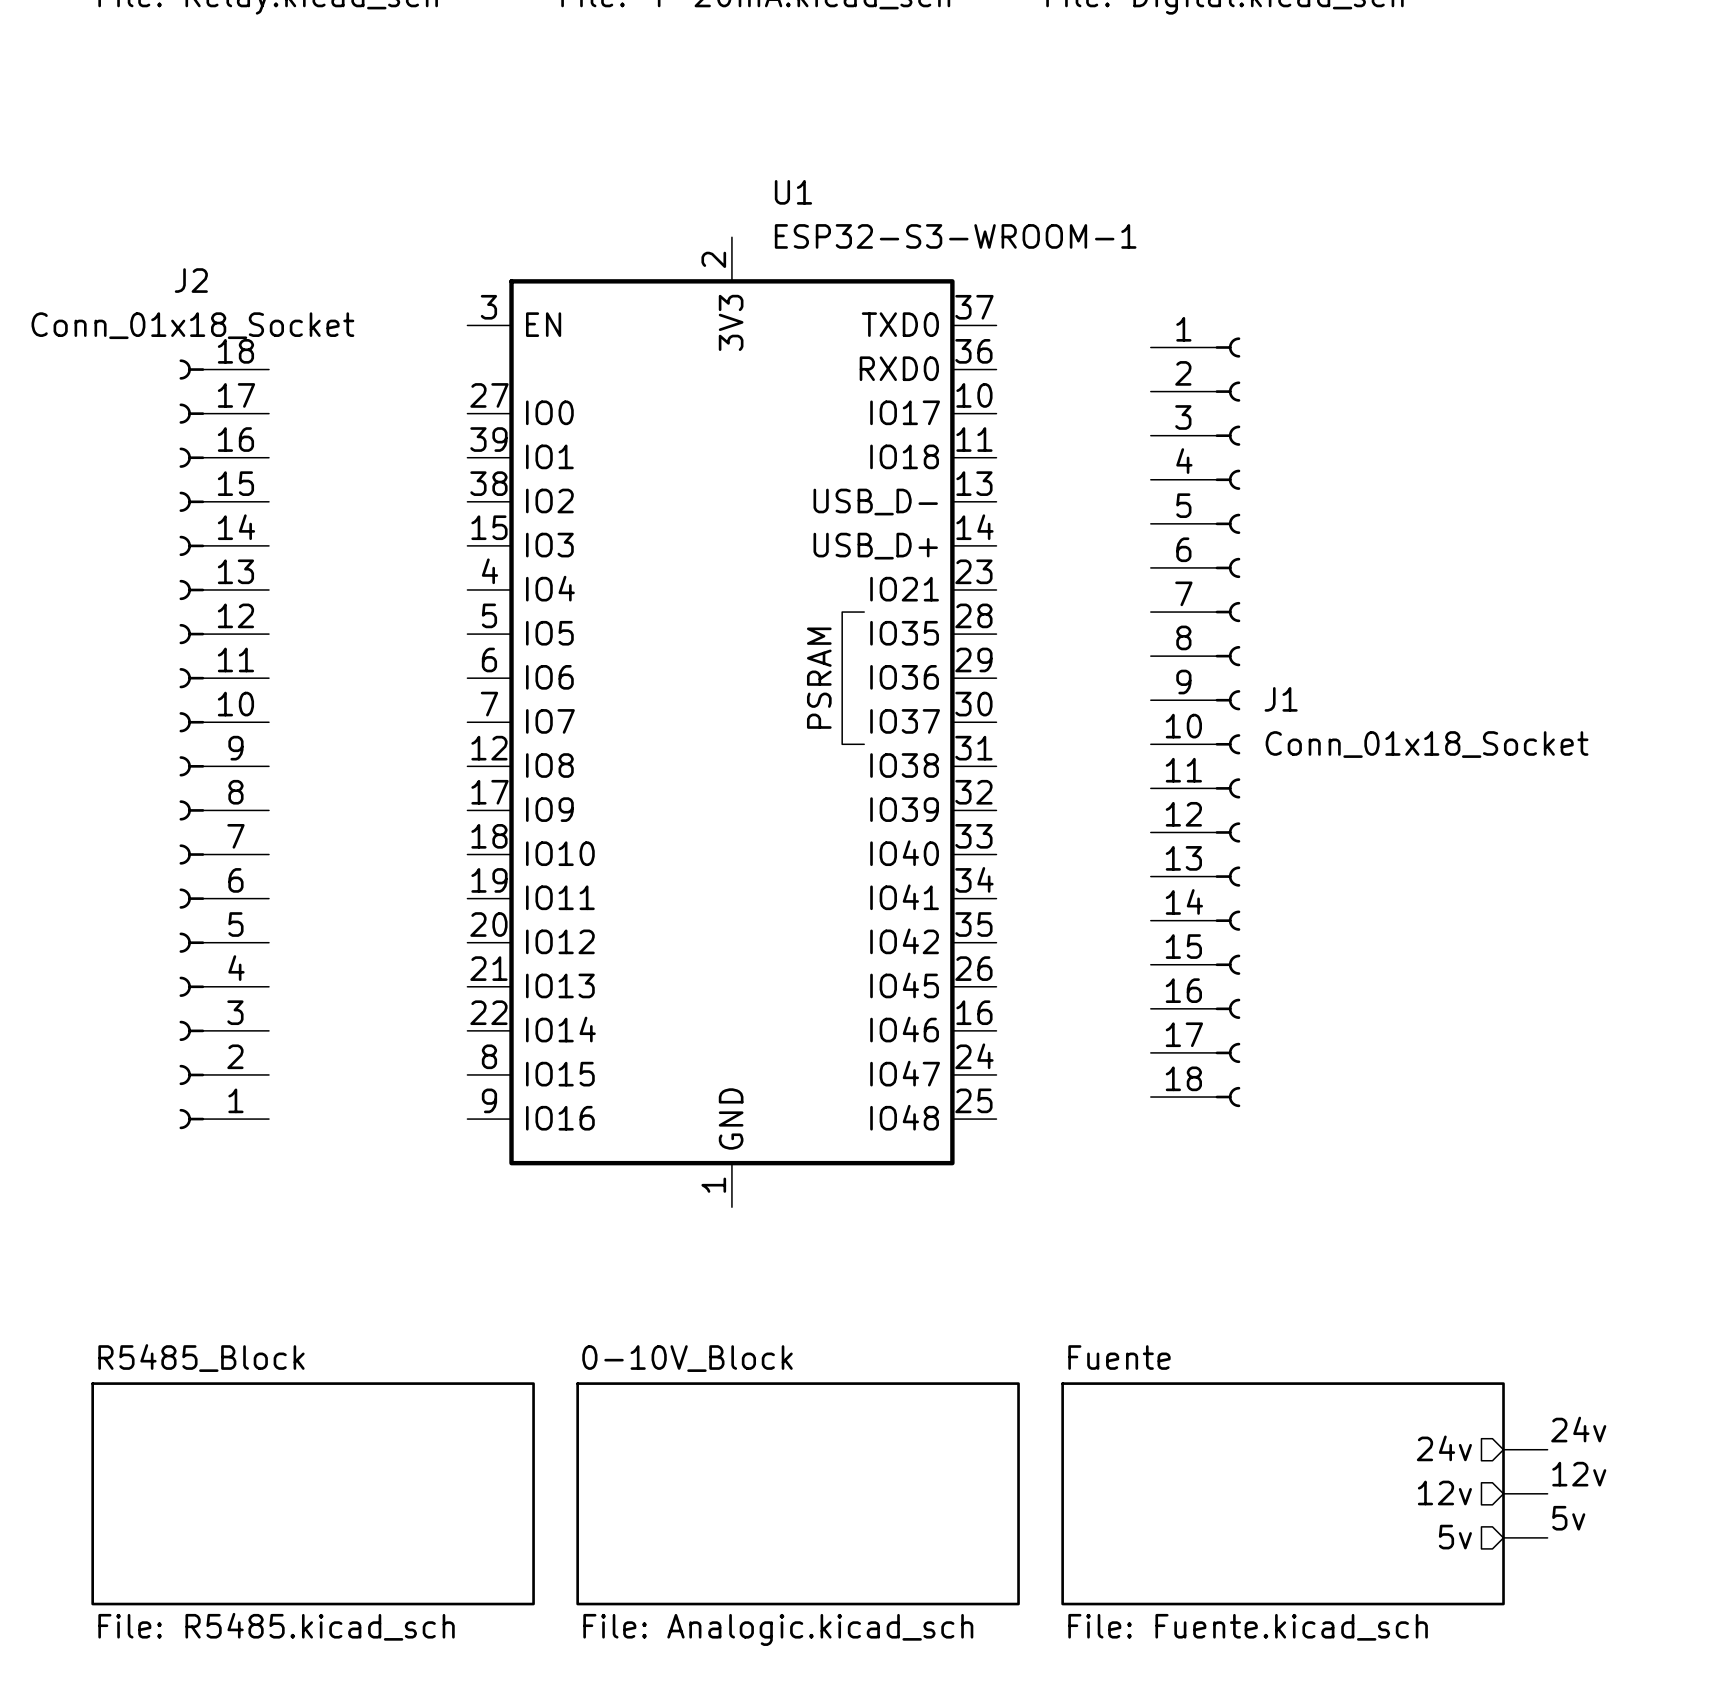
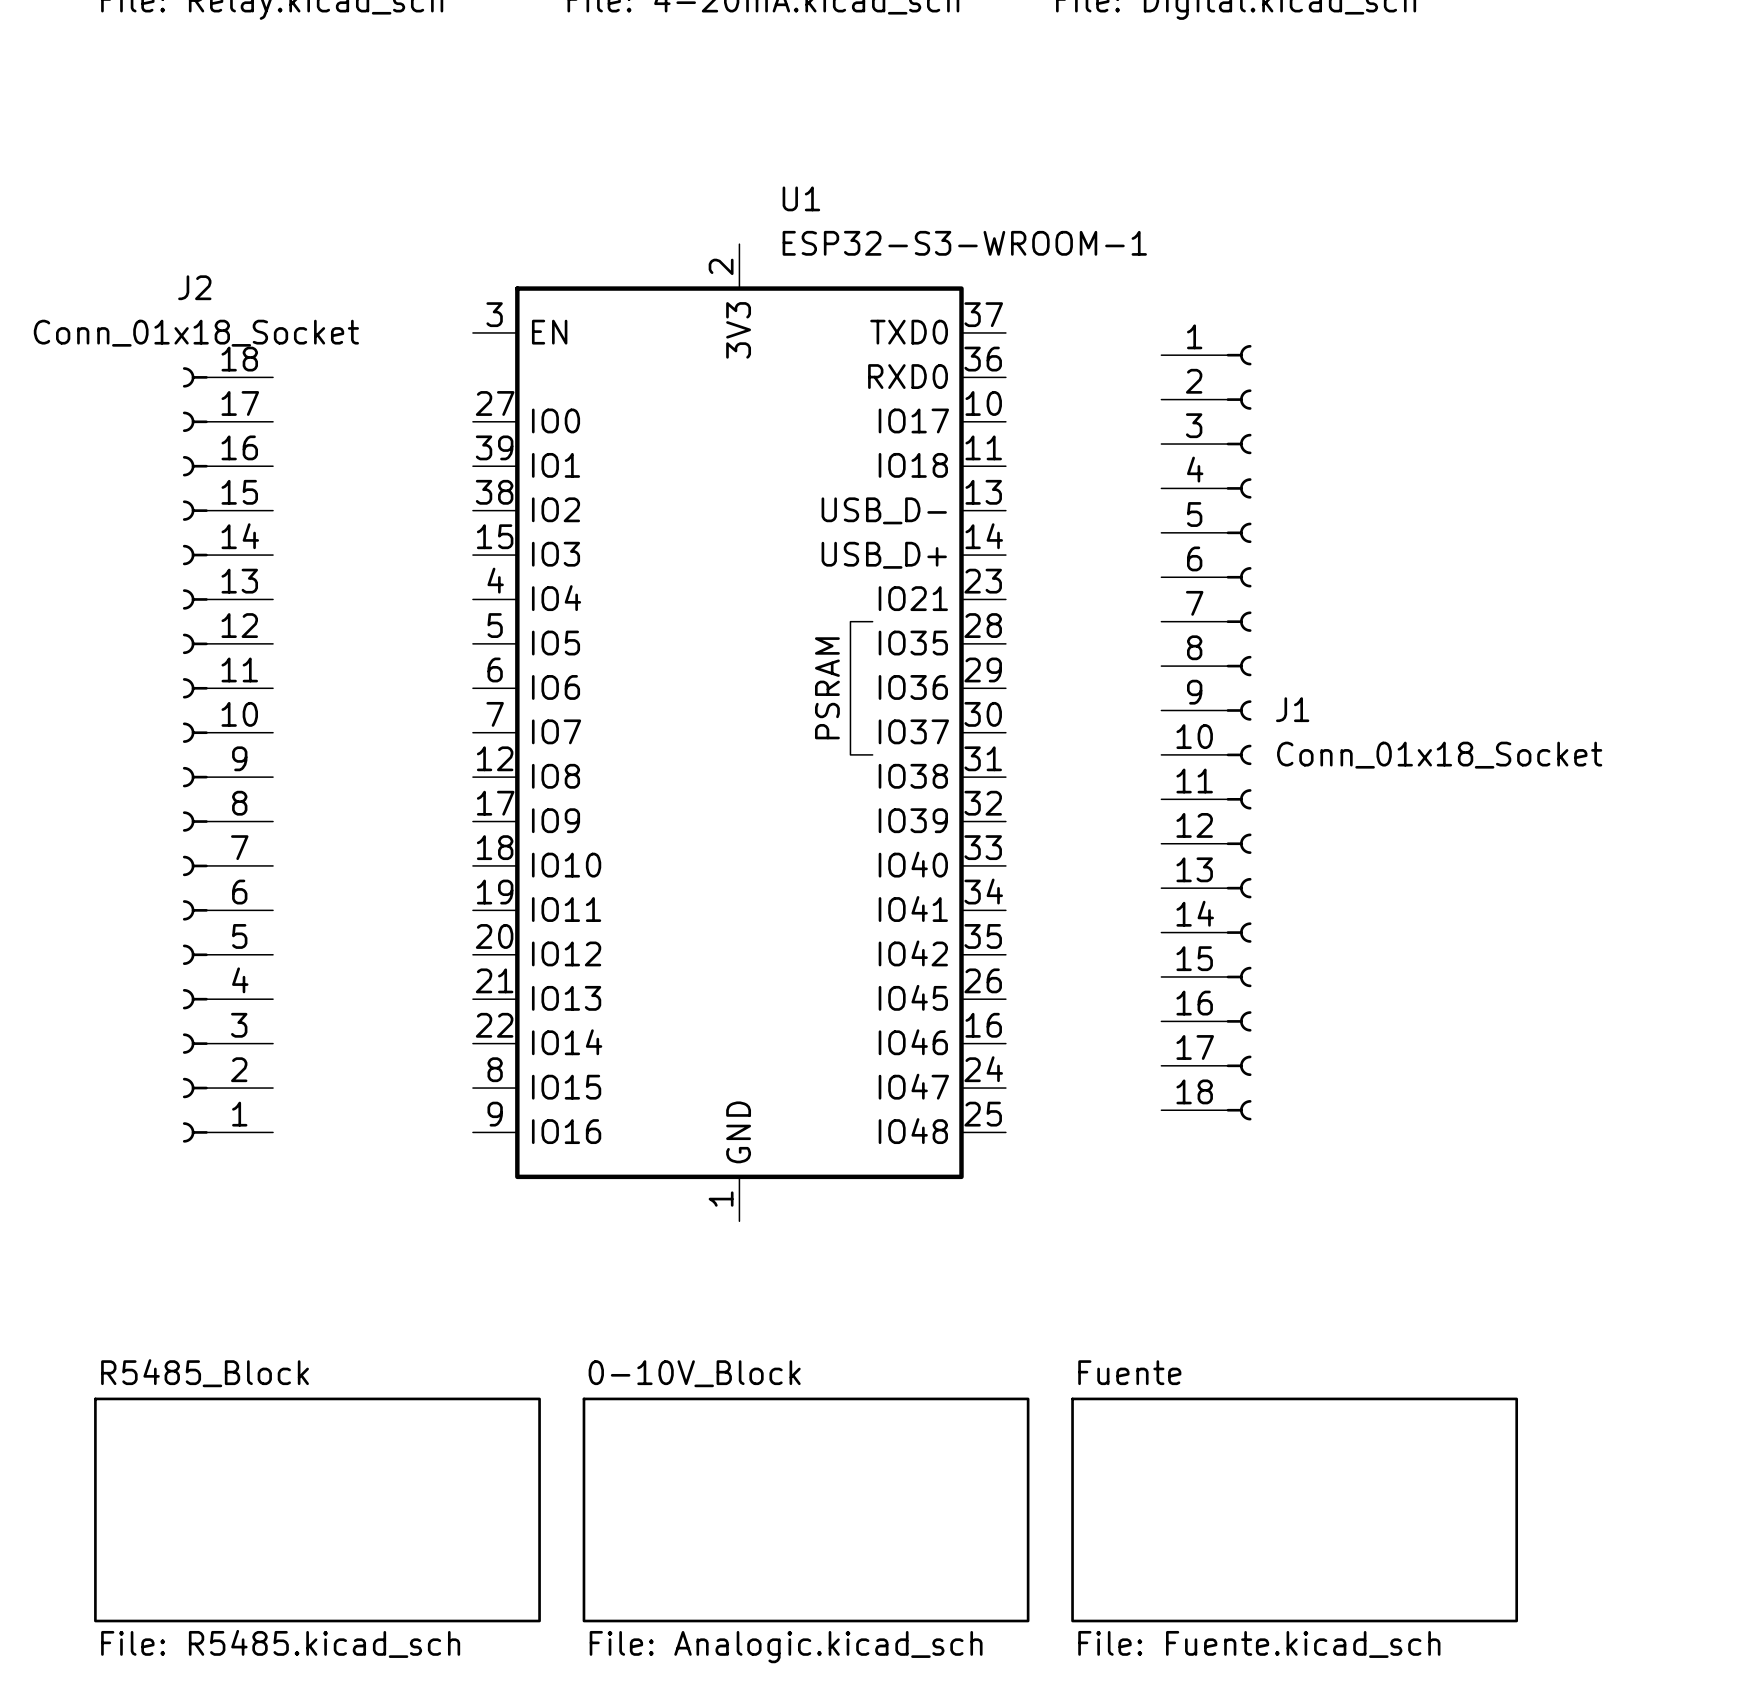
label: 24v (1578, 1429) -> none
sheet pin: 24v (1444, 1448) -> none
wire: (1503, 1449) (1547, 1449) -> none
label: 12v (1579, 1474) -> none
sheet pin: 12v (1444, 1492) -> none
wire: (1503, 1493) (1547, 1493) -> none
label: 5v (1568, 1518) -> none
sheet pin: 5v (1455, 1537) -> none
wire: (1503, 1537) (1547, 1537) -> none

